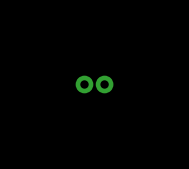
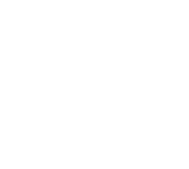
part: (94, 84) -> none

